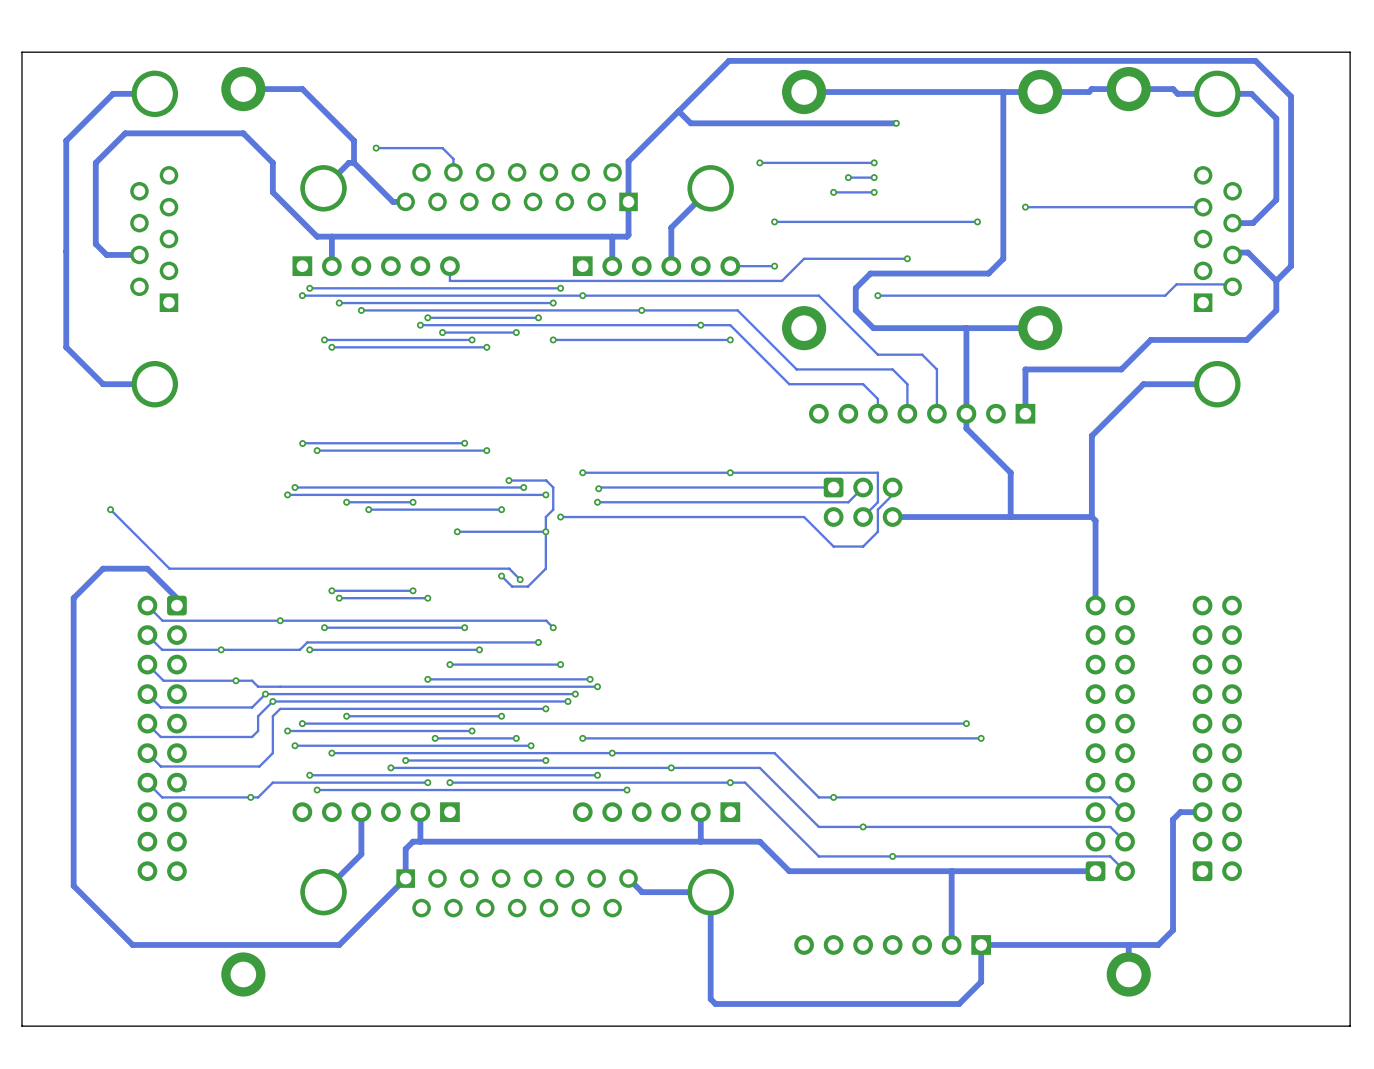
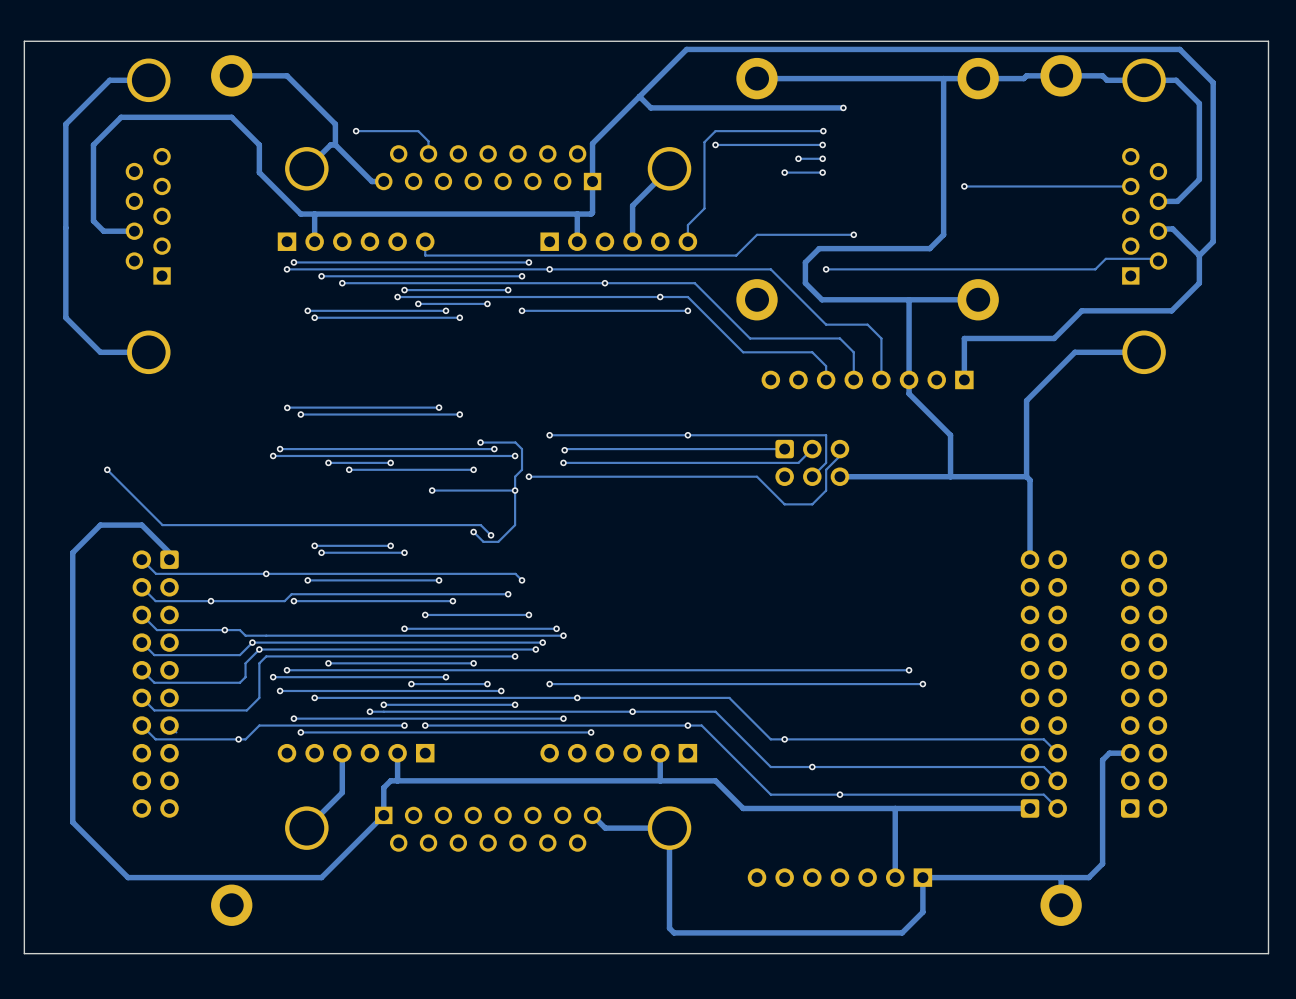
via: none -> (823, 131)
via: (774, 221) -> none
track: (977, 221) (774, 221) -> none
via: (977, 221) -> none
track: (774, 266) (730, 266) -> (823, 131) (715, 131) (704, 142) (704, 208) (687, 225) (687, 241)
via: (774, 266) -> none

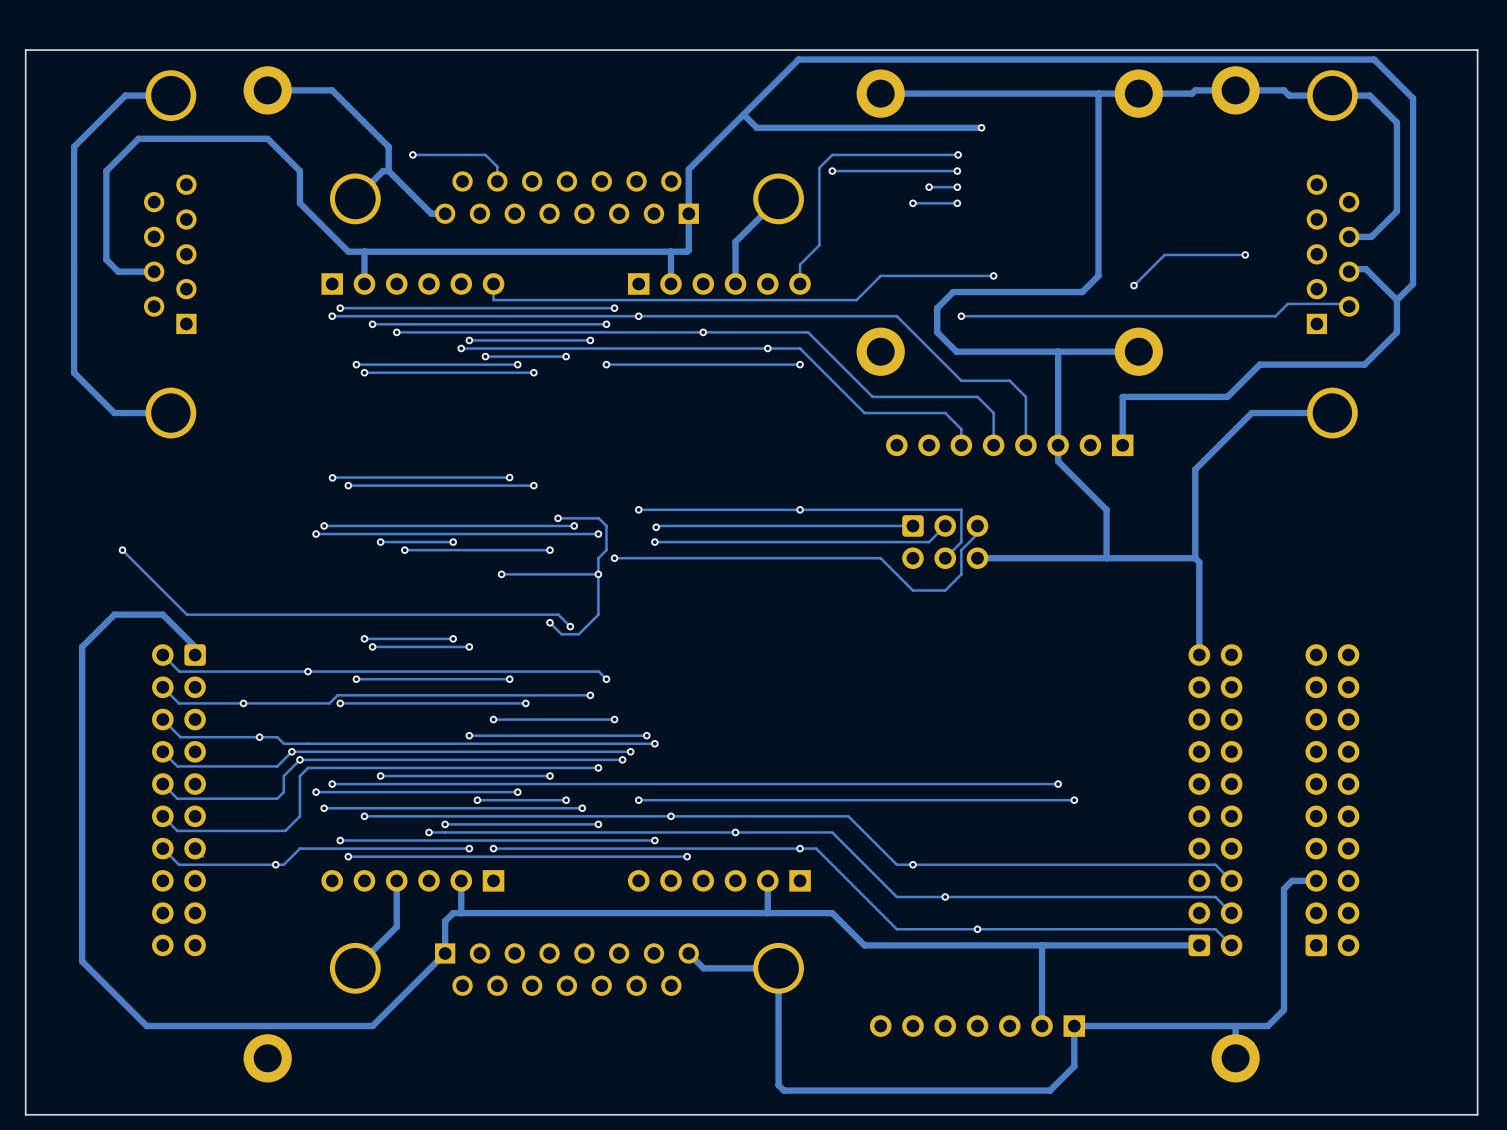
via: (964, 186) -> none
track: (1130, 186) (964, 186) -> none
track: none -> (1245, 254) (1164, 254) (1133, 285)
via: none -> (1245, 254)
via: none -> (1133, 285)

